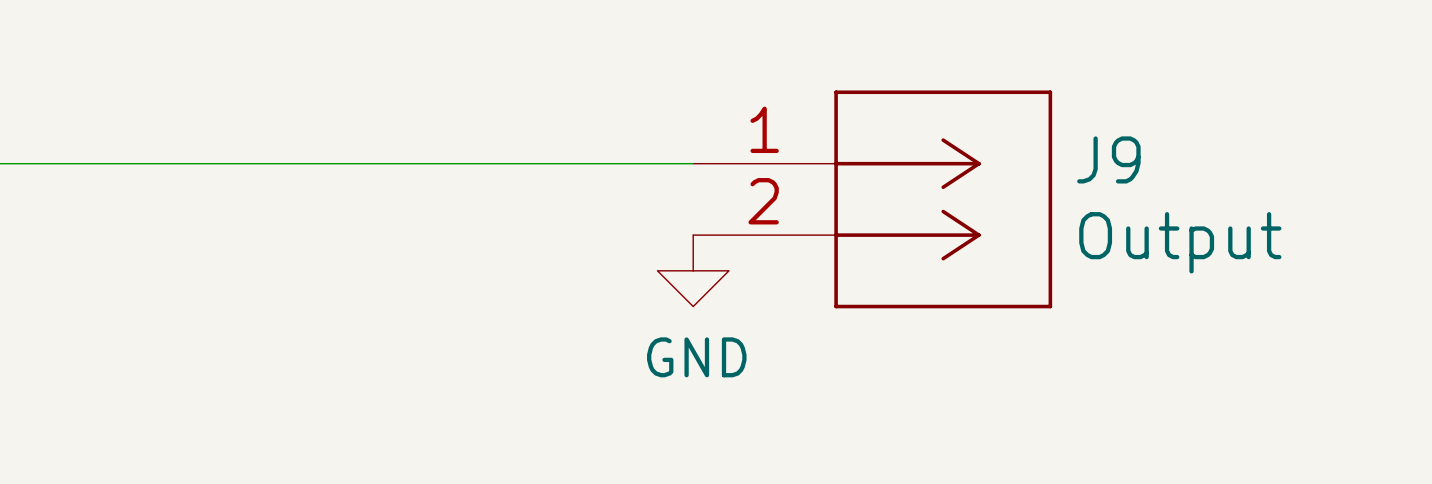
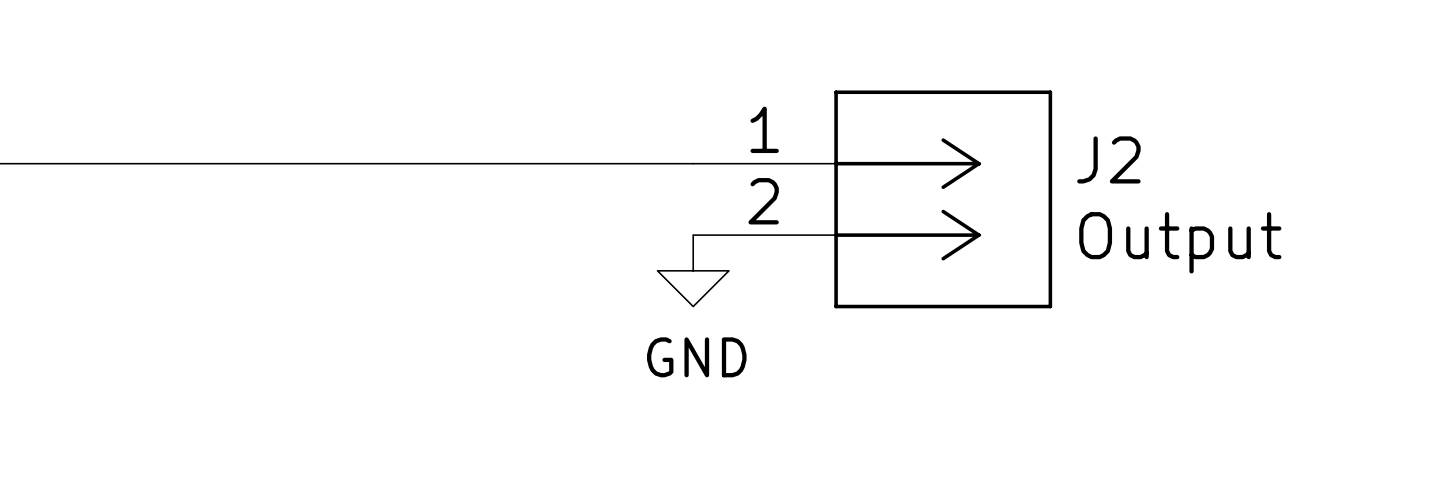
J9 name: J9 (1108, 159) -> J2 (1108, 159)

